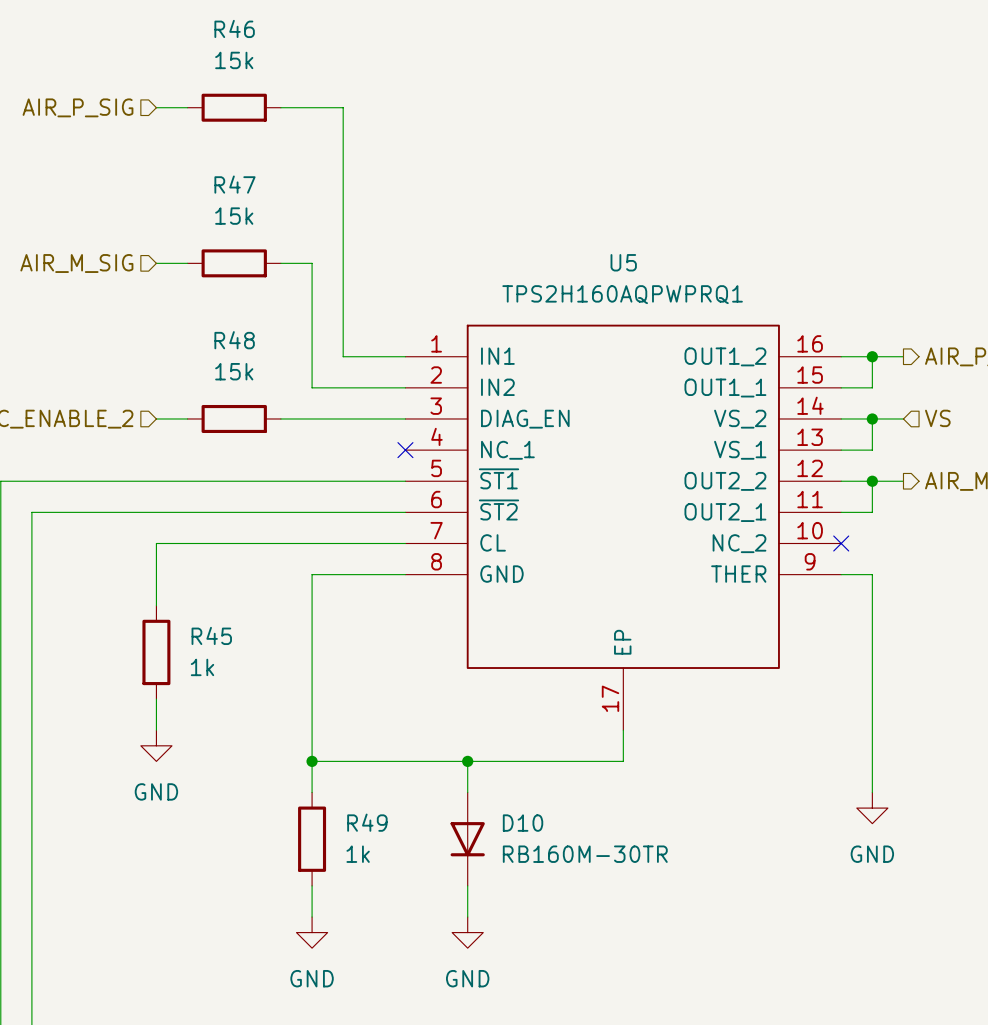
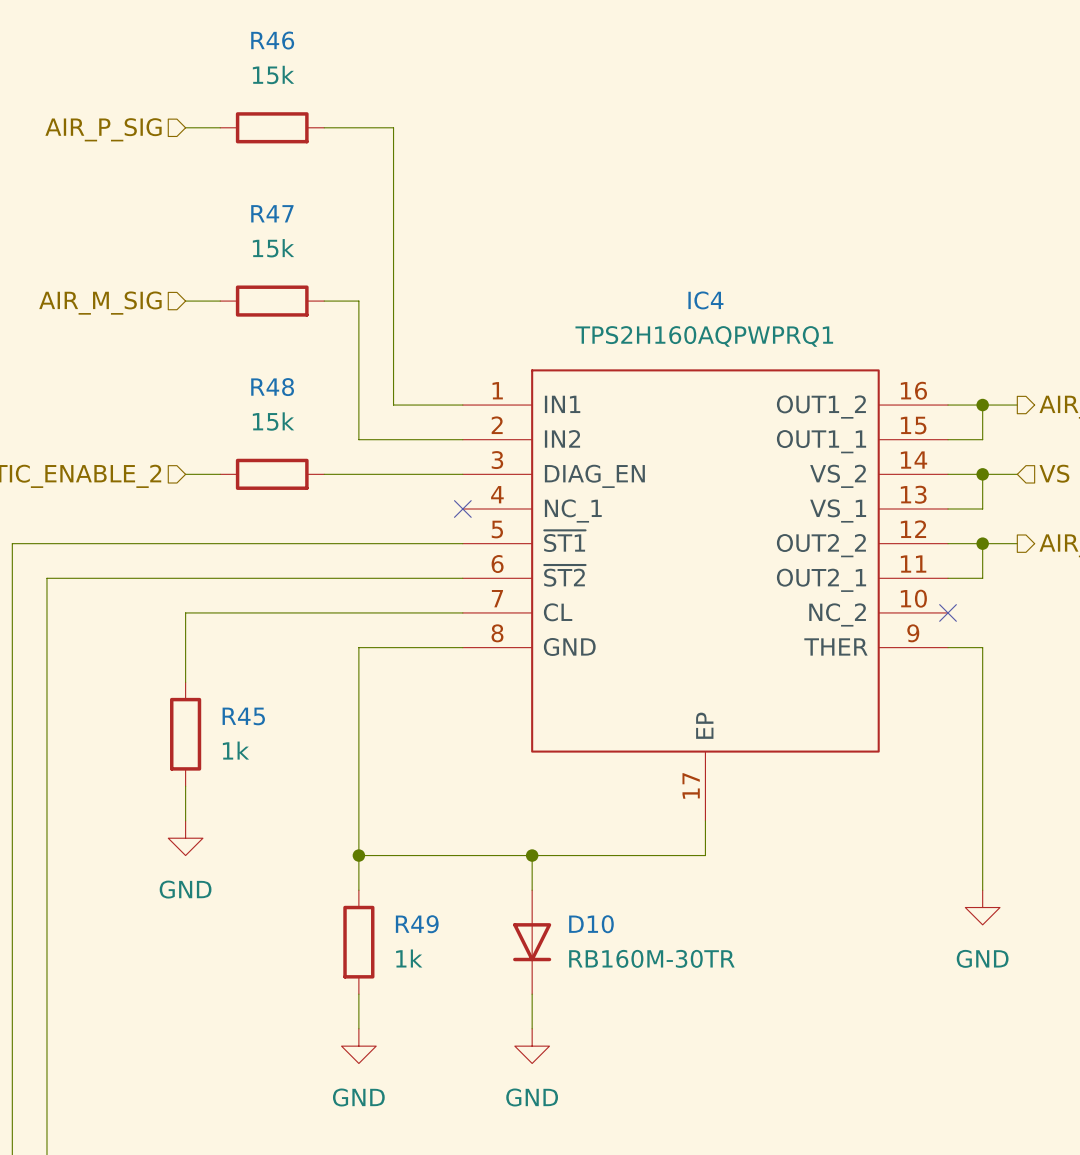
U5 name: U5 (623, 262) -> IC4 (705, 300)

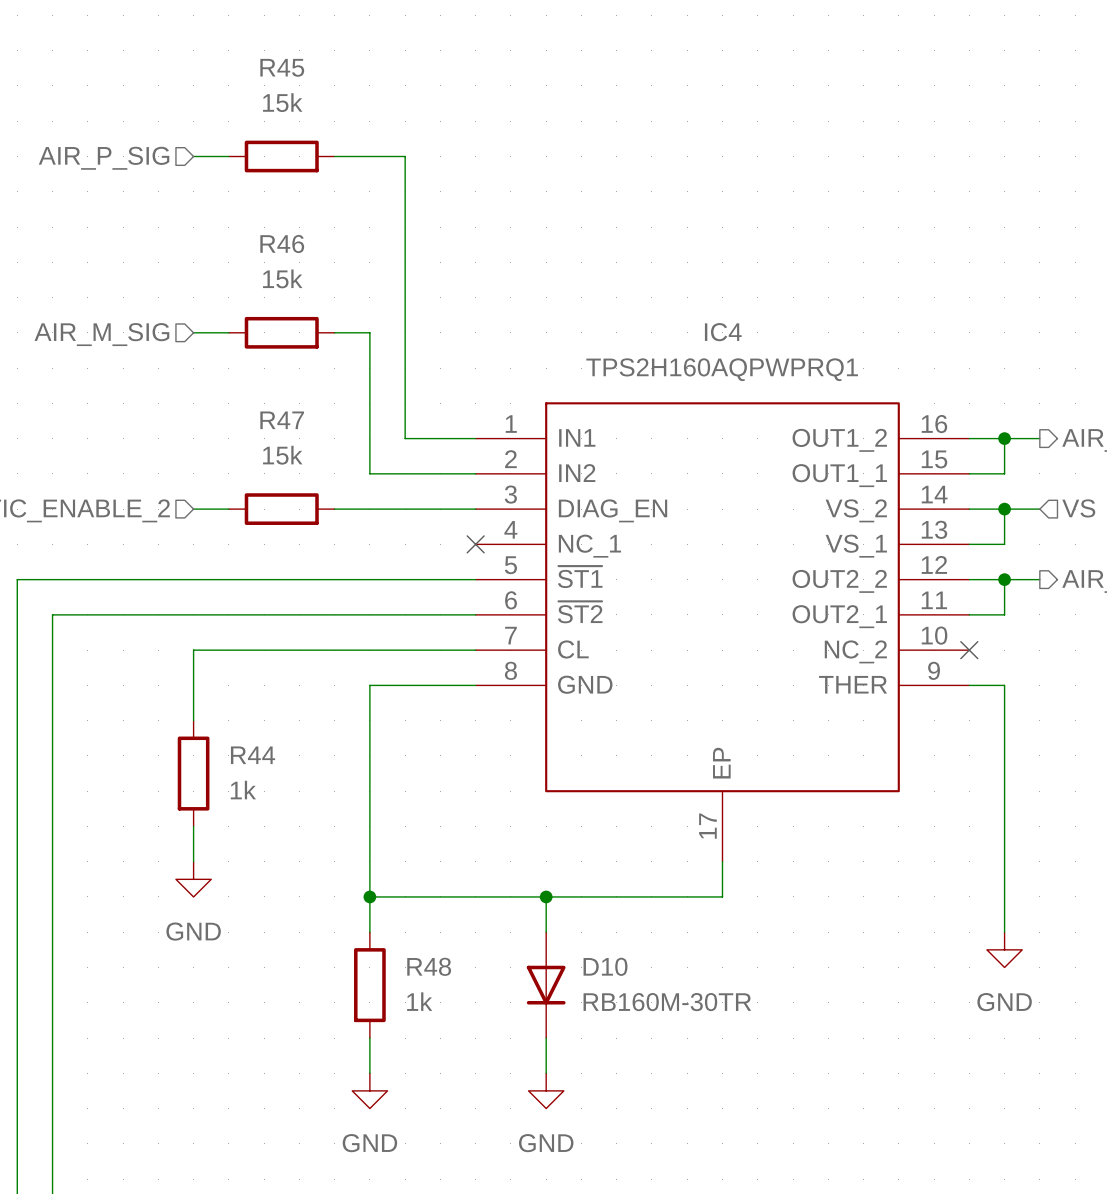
R46 name: R46 (272, 40) -> R45 (282, 67)
R47 name: R47 (272, 213) -> R46 (282, 243)
R48 name: R48 (272, 387) -> R47 (282, 420)
R45 name: R45 (243, 716) -> R44 (253, 755)
R49 name: R49 (417, 924) -> R48 (429, 966)

